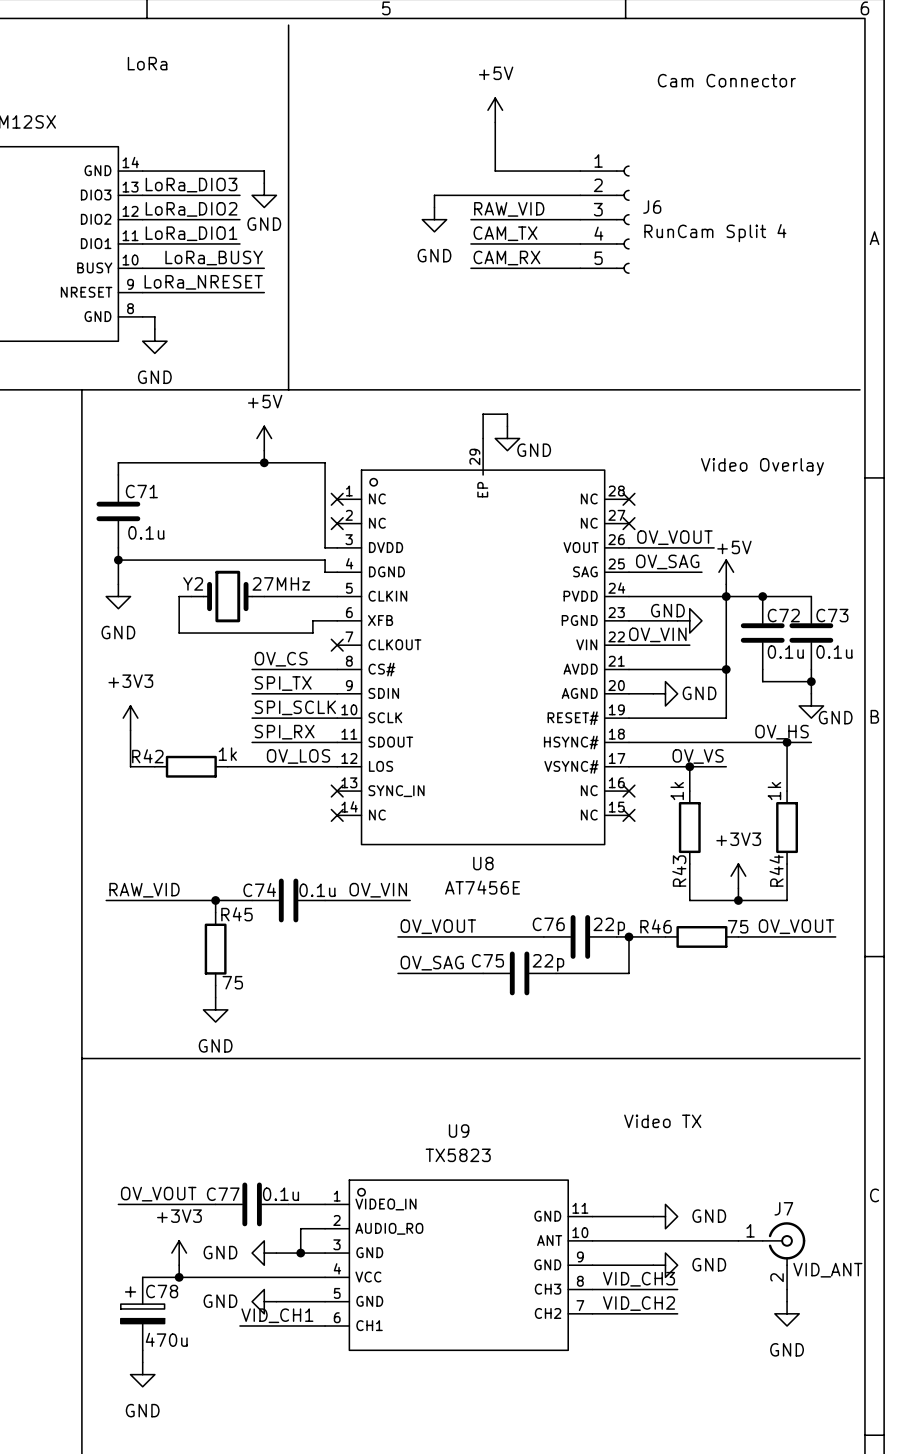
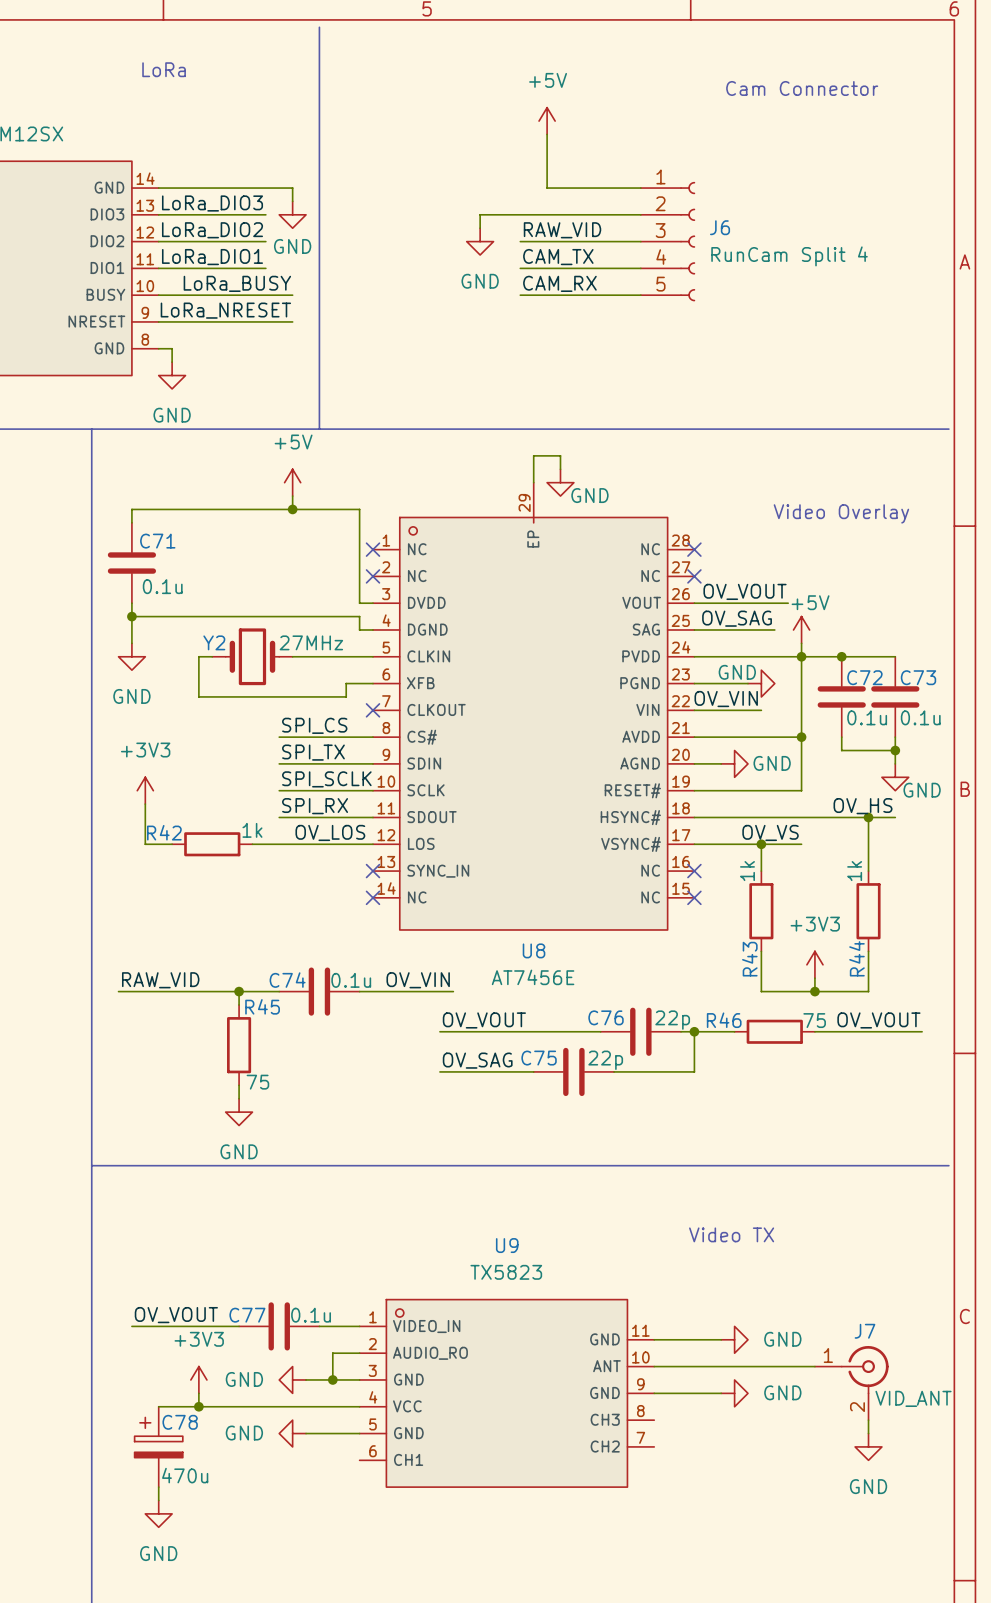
label: OV_CS (281, 659) -> SPI_CS (314, 725)
label: VID_CH3 (639, 1279) -> none
wire: (592, 1289) (677, 1289) -> none
label: VID_CH2 (639, 1303) -> none
wire: (592, 1313) (677, 1313) -> none
label: VID_CH1 (277, 1315) -> none
wire: (239, 1325) (325, 1325) -> none

